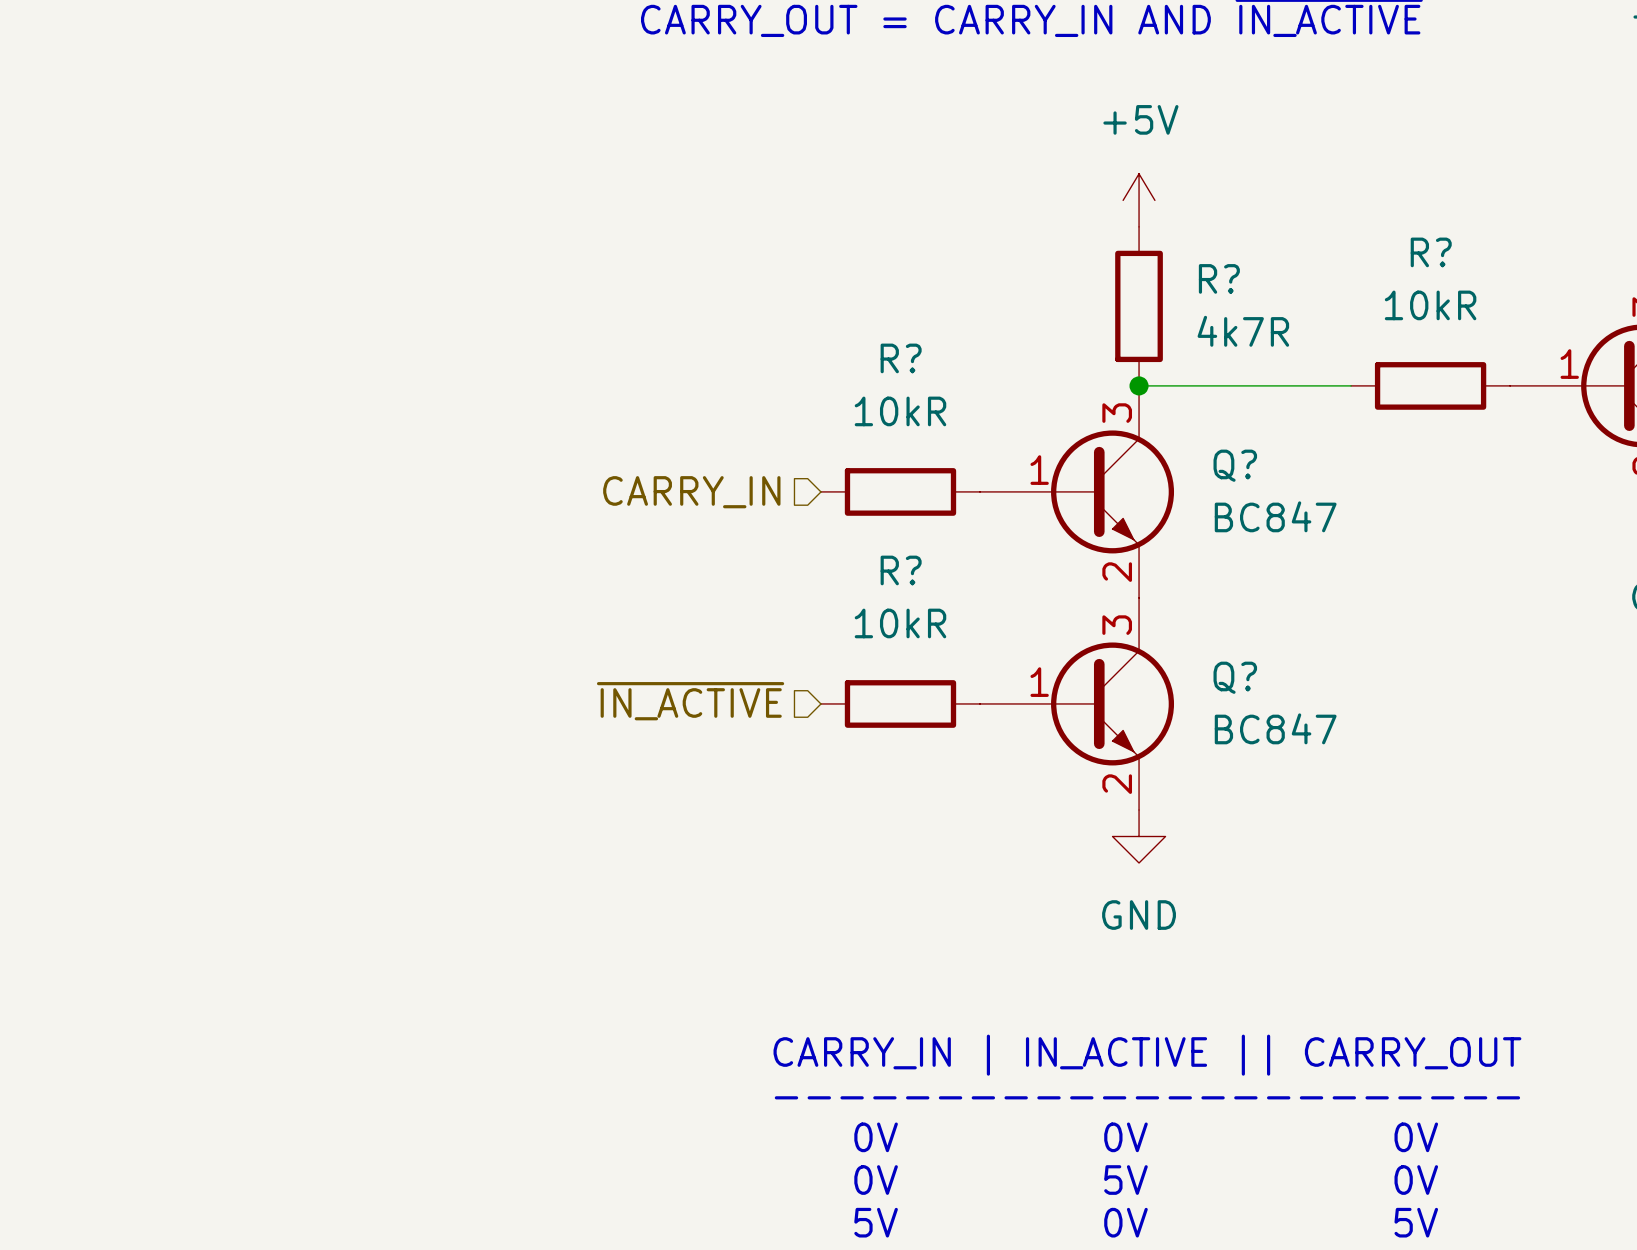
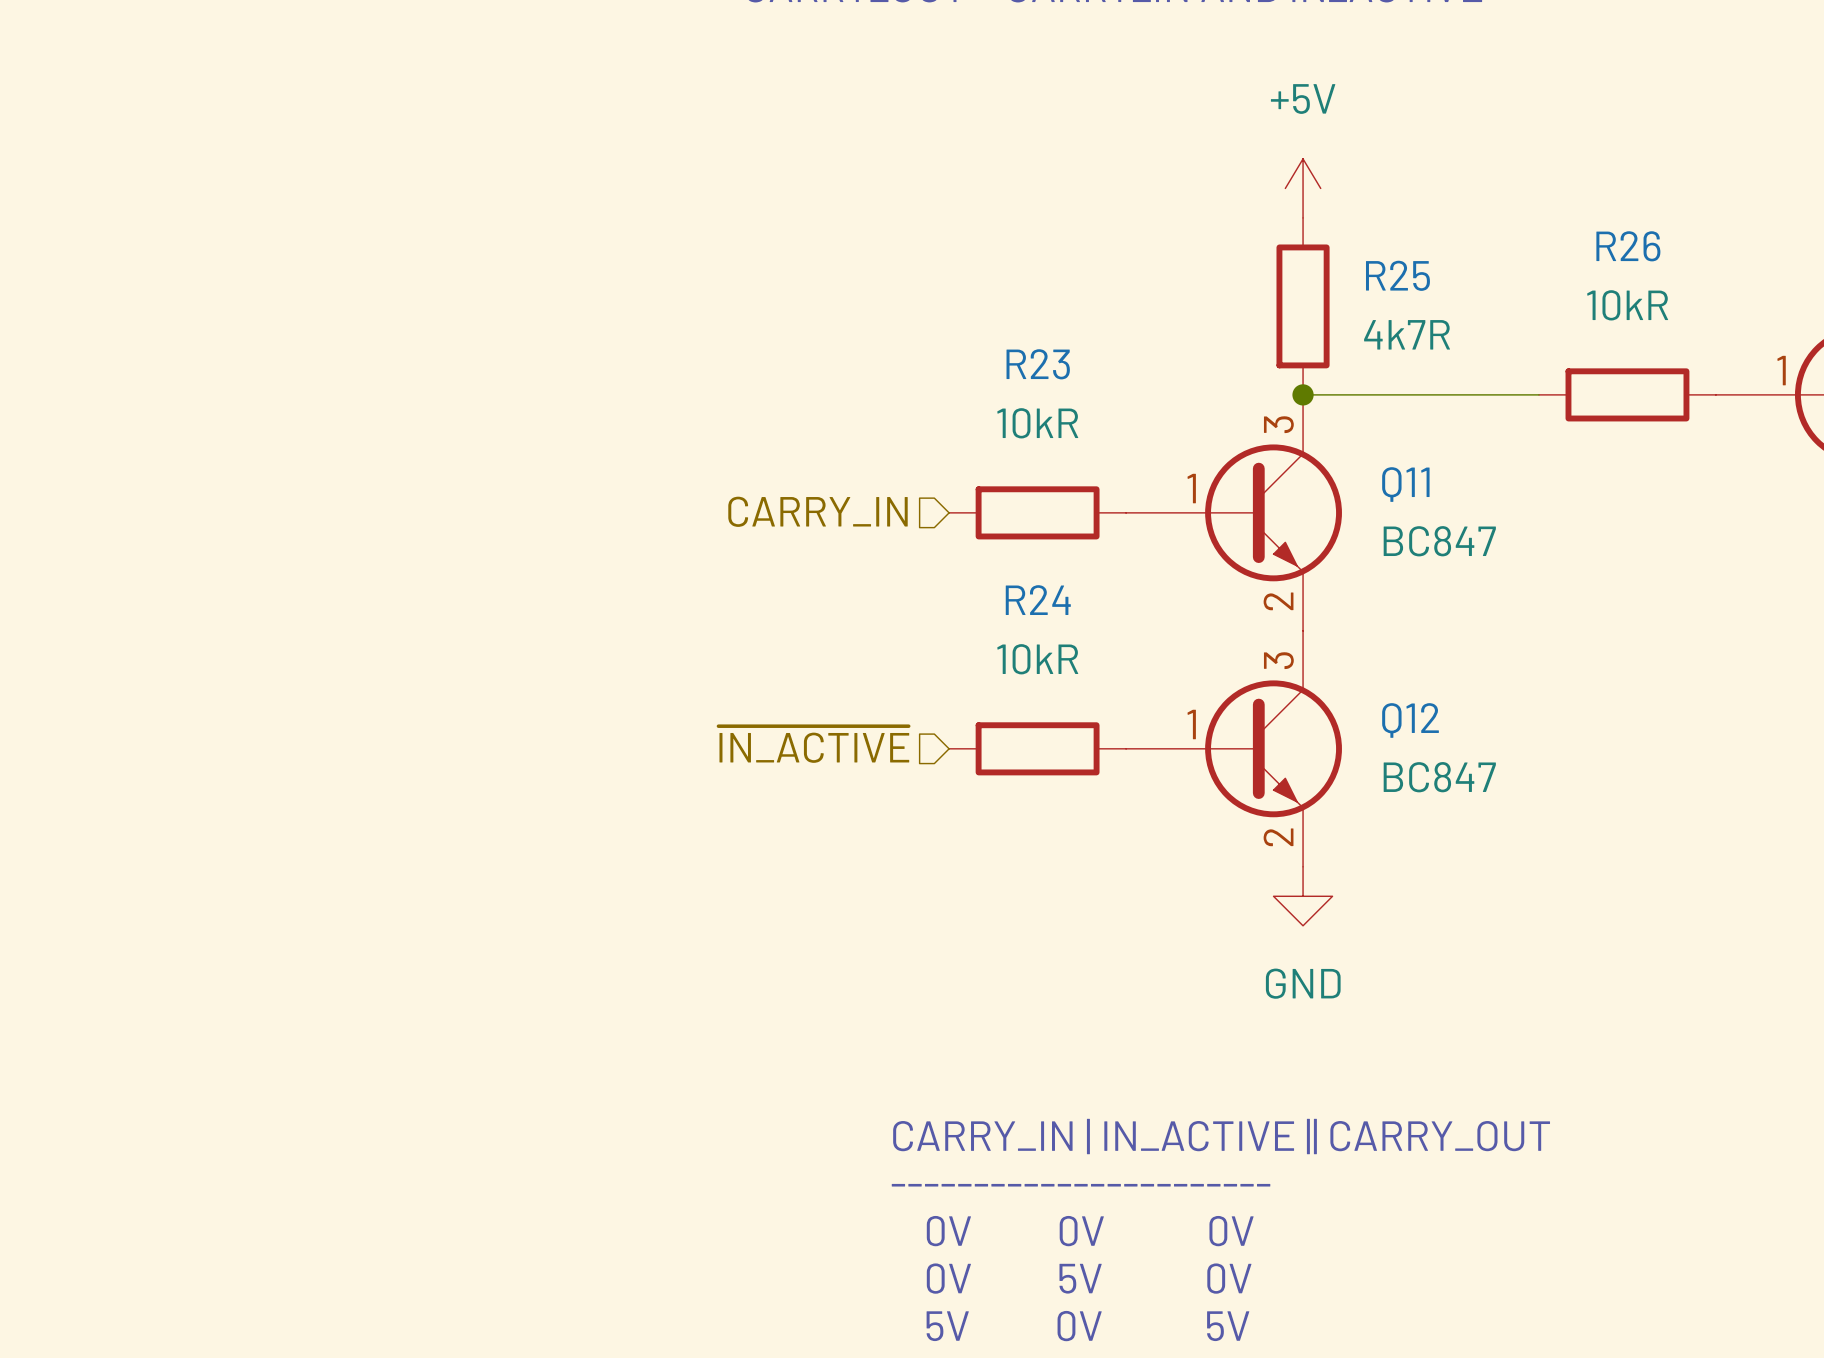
R? name: R? (1431, 252) -> R26 (1628, 246)
R? name: R? (1219, 278) -> R25 (1397, 275)
R? name: R? (901, 358) -> R23 (1038, 364)
Q? name: Q? (1235, 465) -> Q11 (1405, 484)
R? name: R? (901, 570) -> R24 (1038, 600)
Q? name: Q? (1235, 677) -> Q12 (1410, 720)

